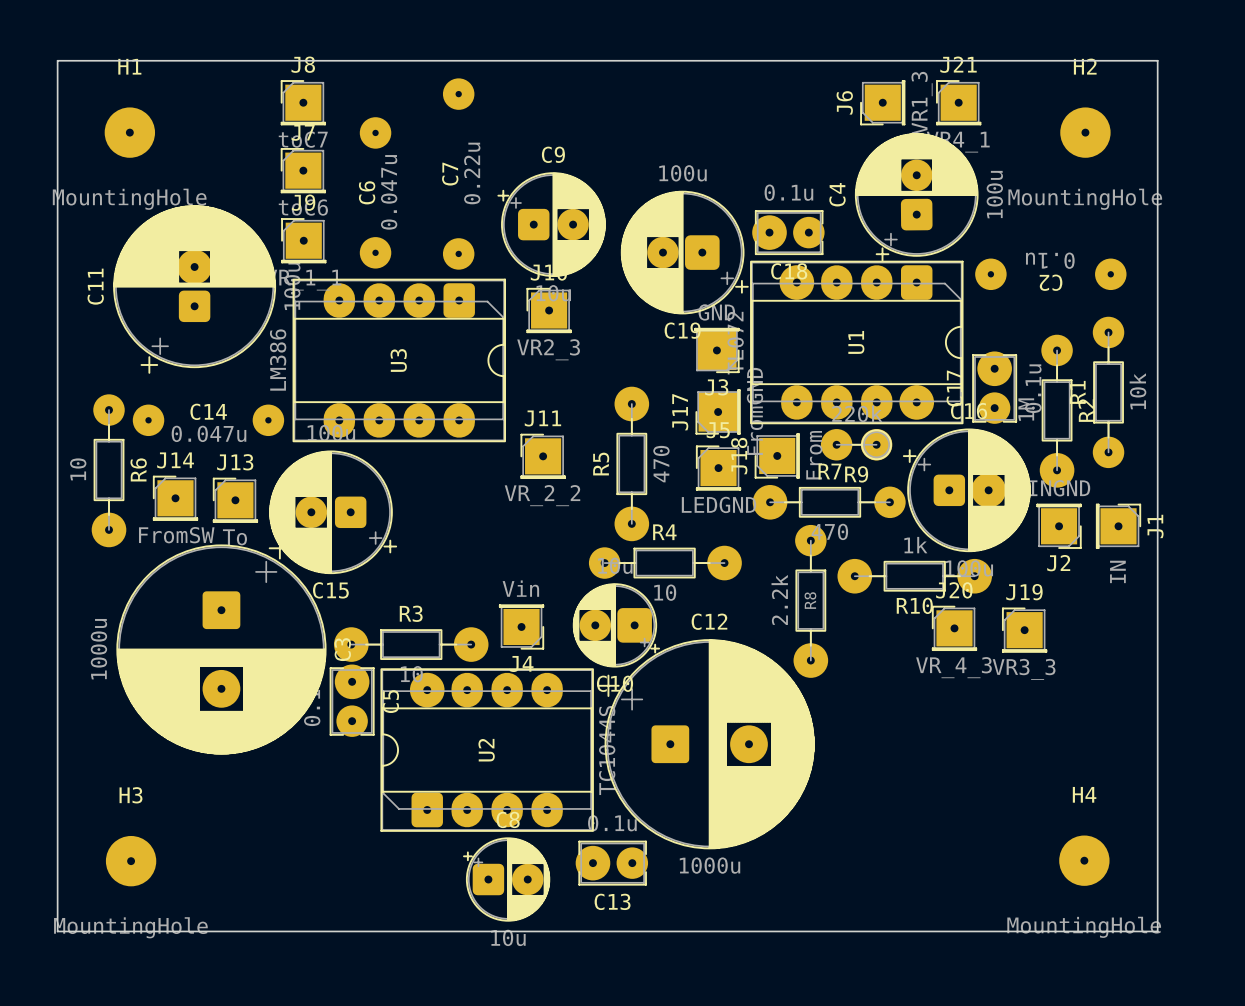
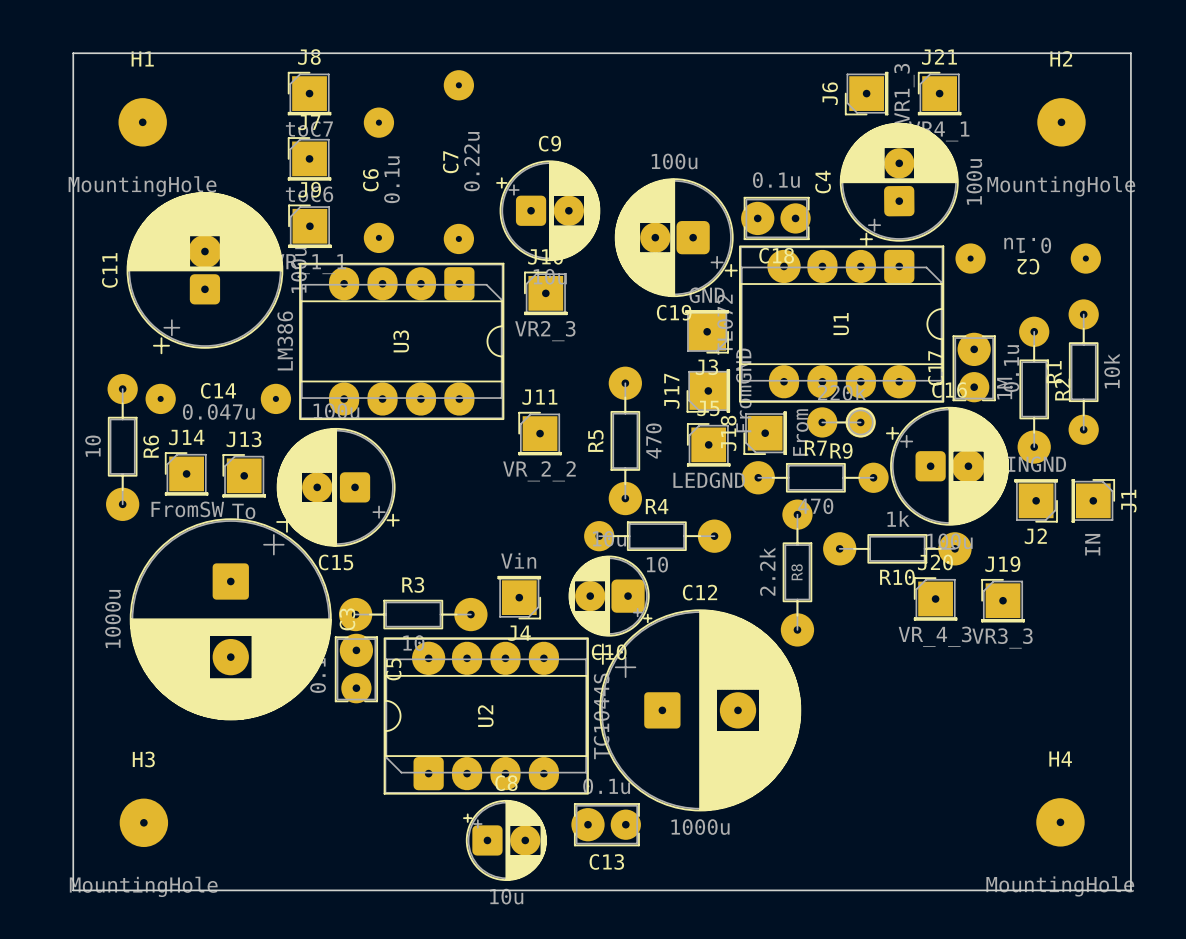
C6 value: 0.047u (389, 192) -> 0.1u (391, 179)

